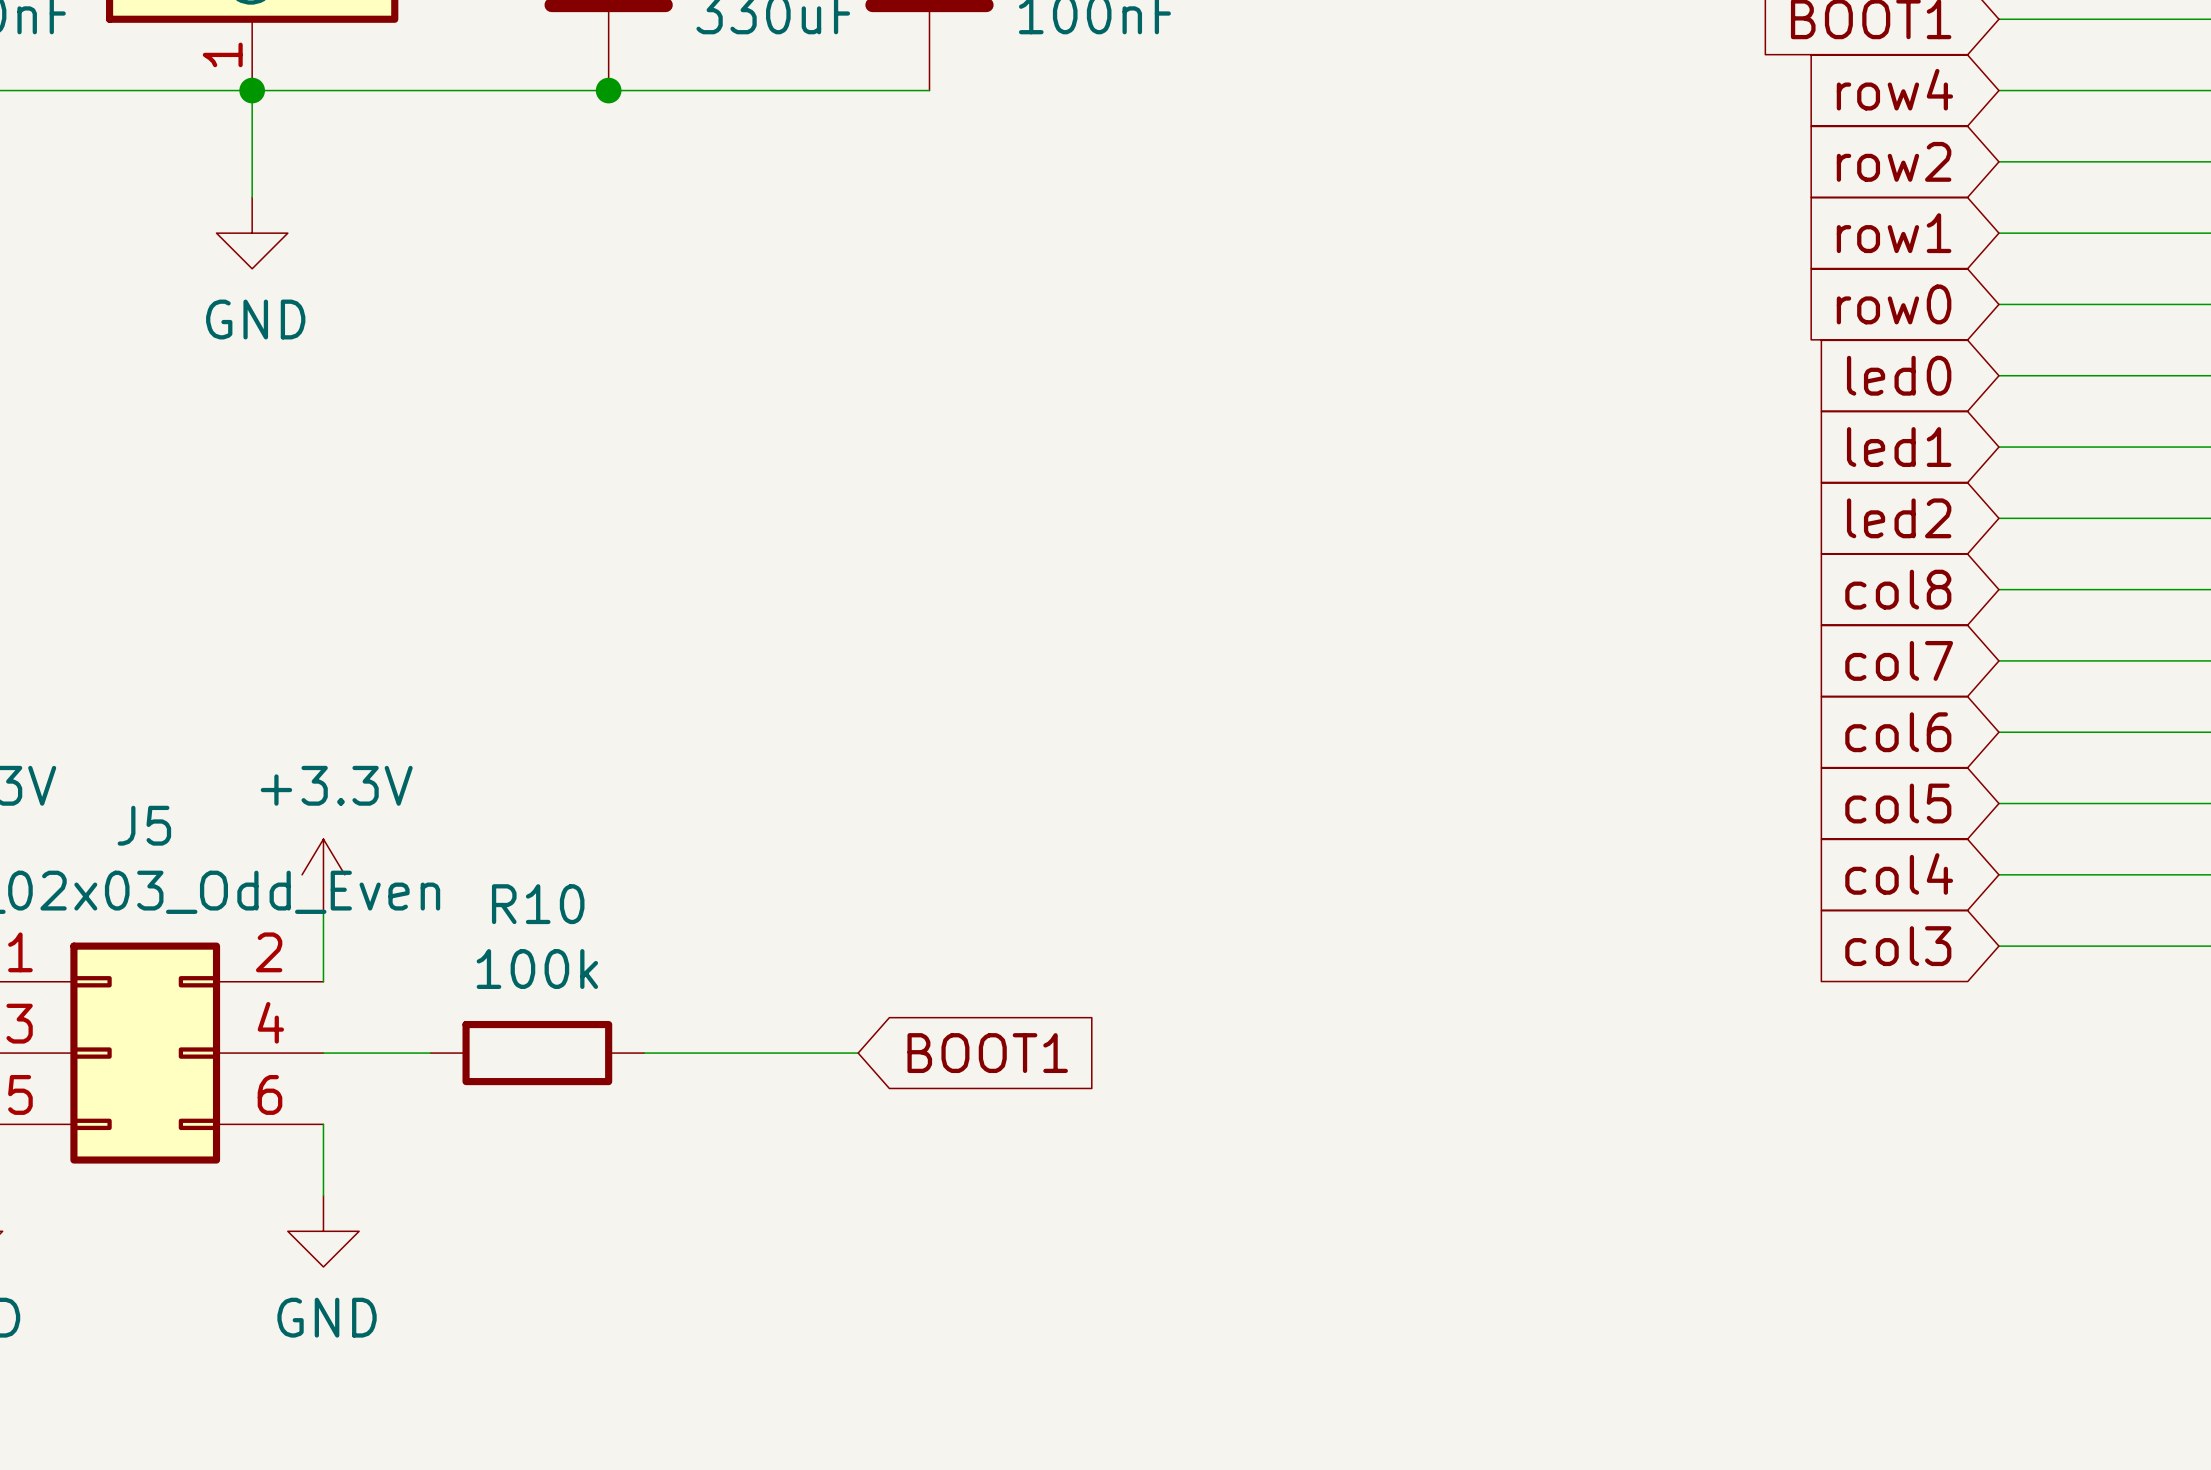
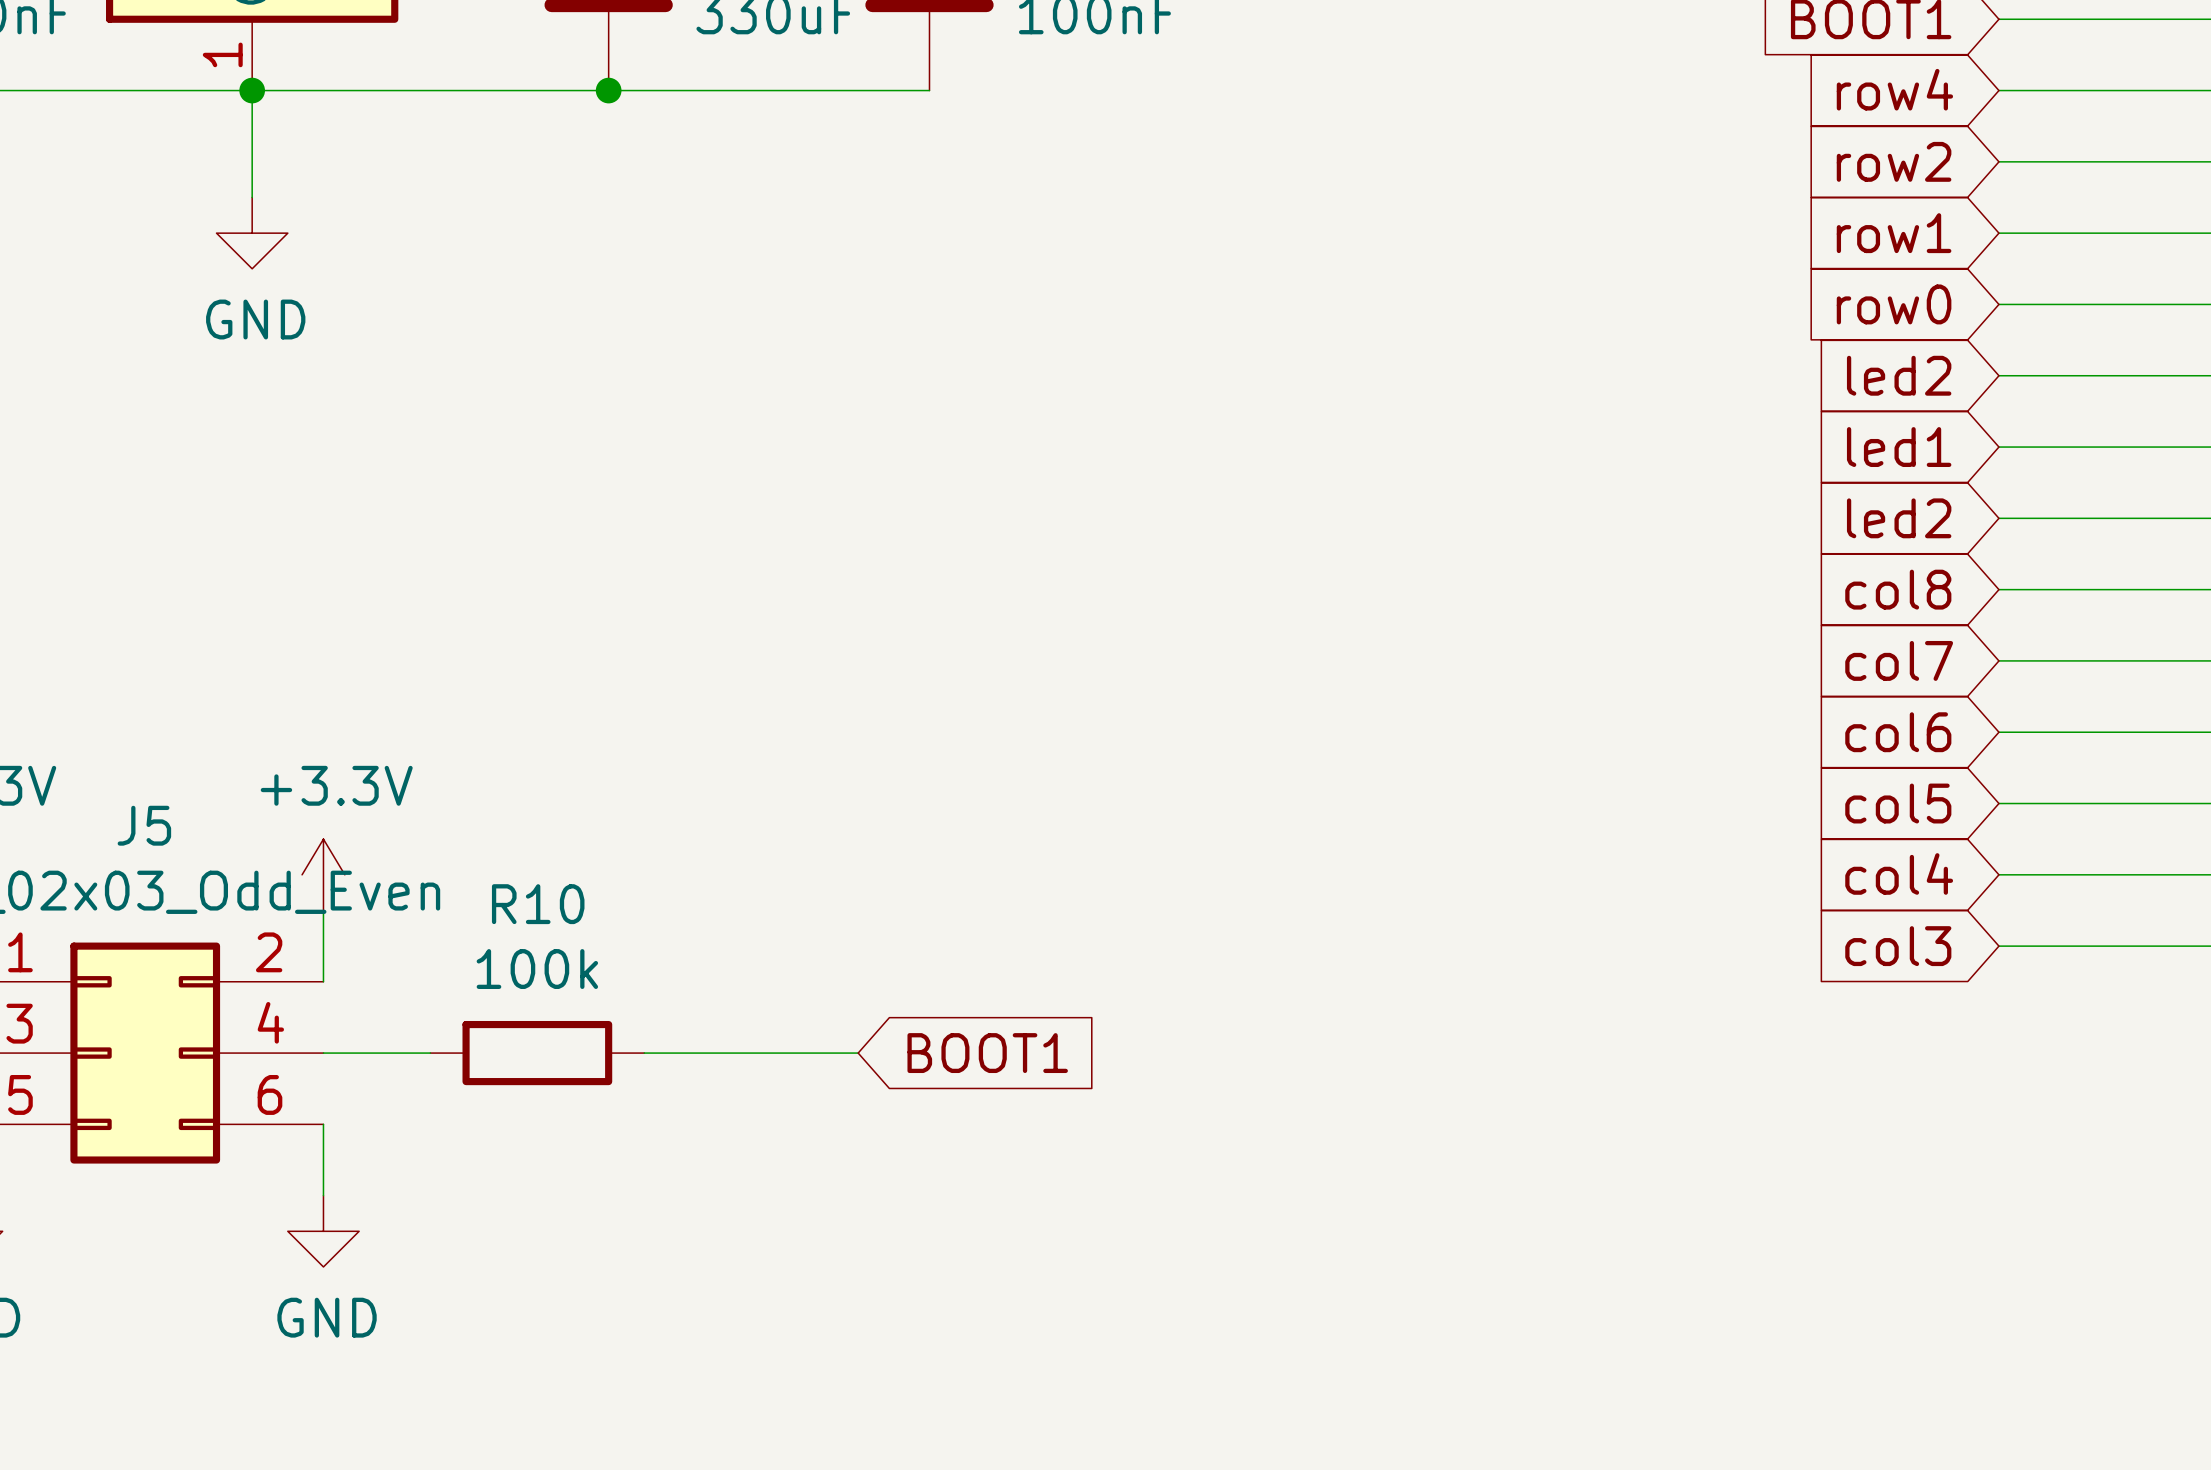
global label: led0 (1899, 375) -> led2 (1899, 375)

